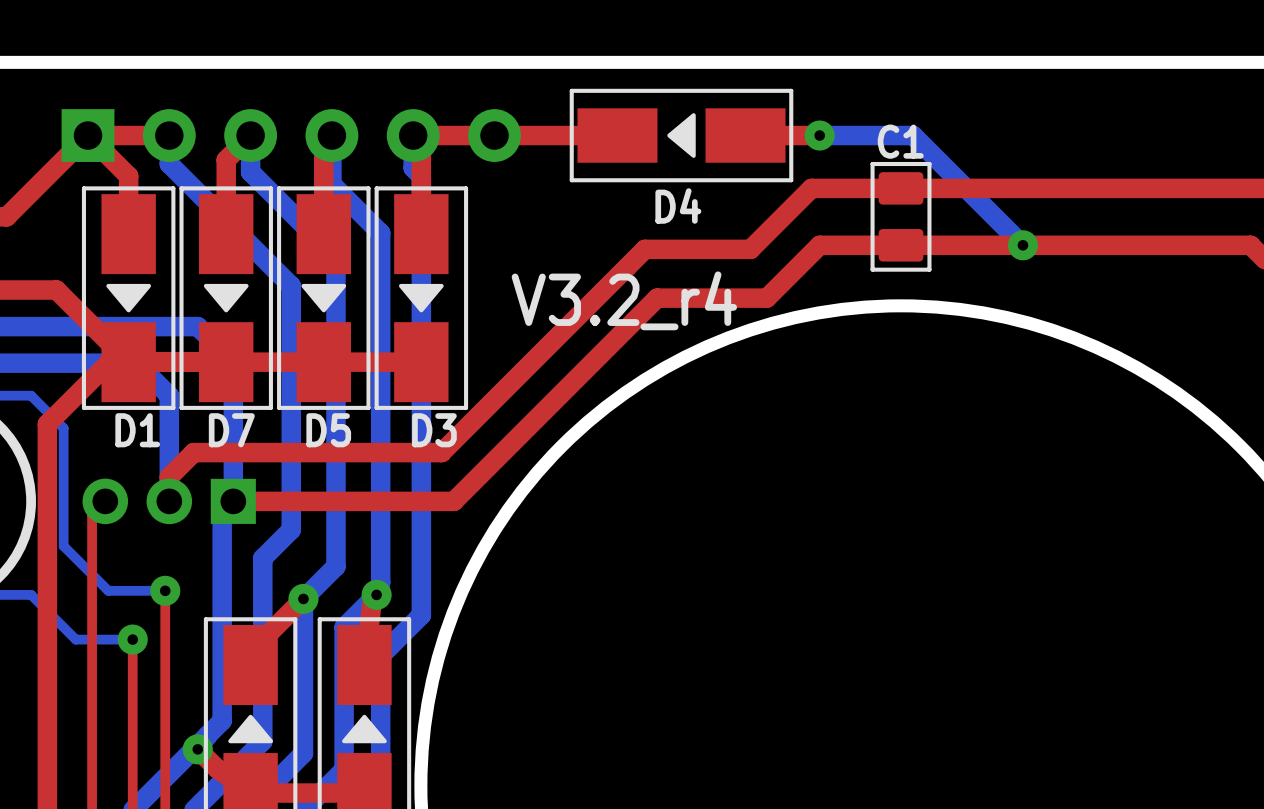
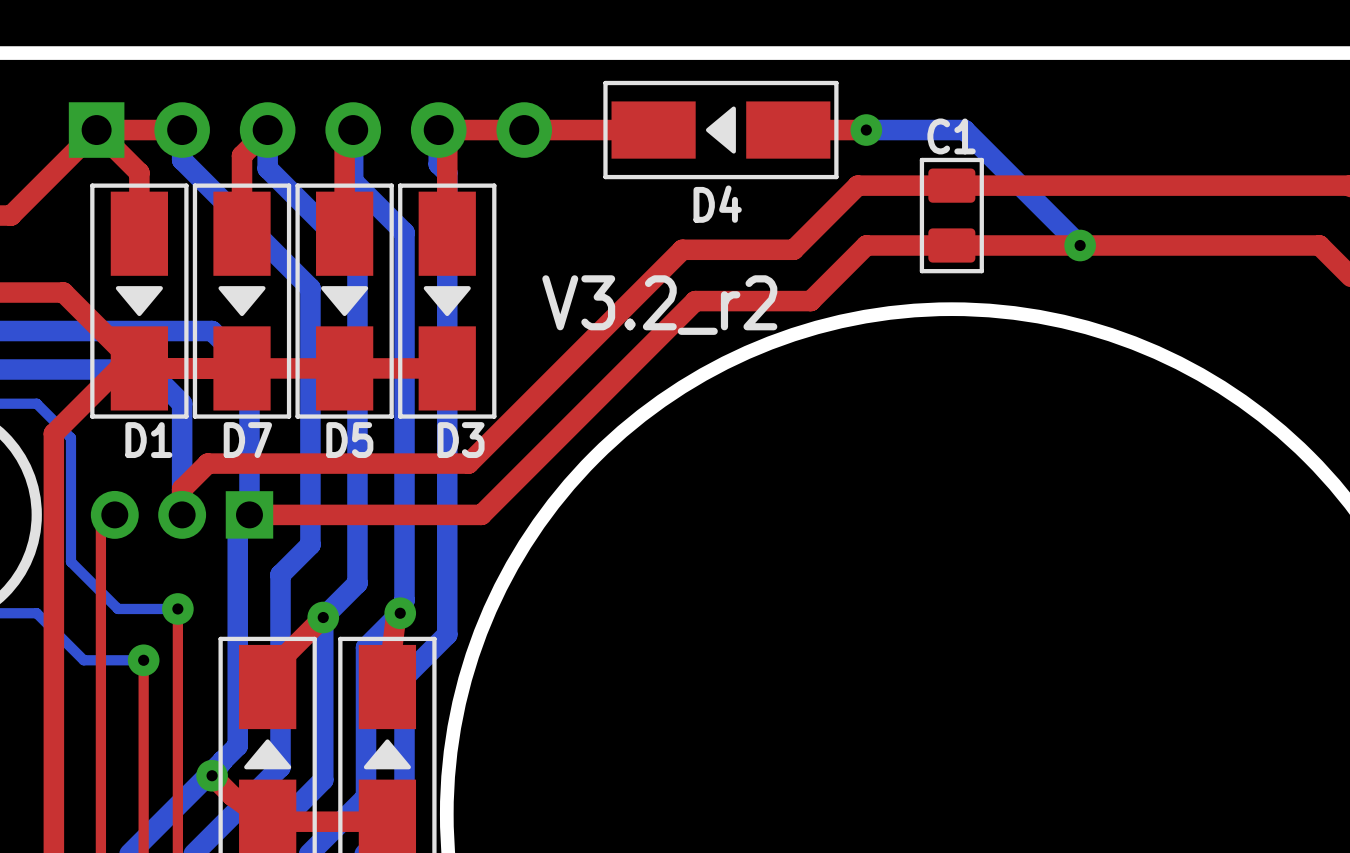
text: V3.2_r4 (624, 300) -> V3.2_r2 (659, 305)

